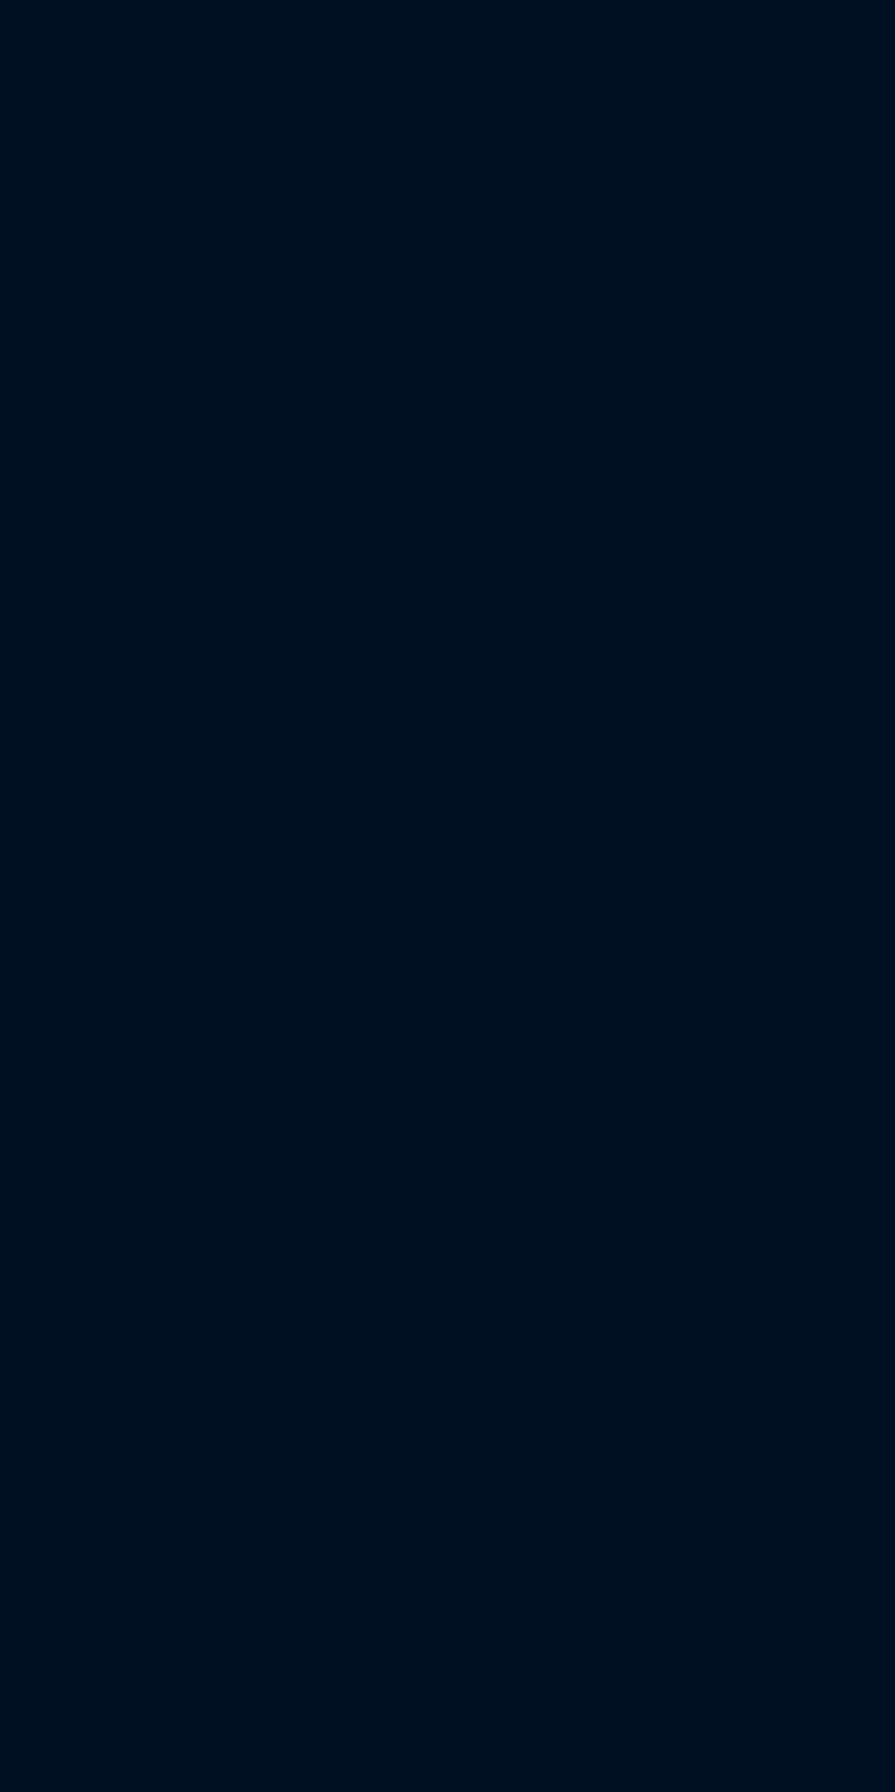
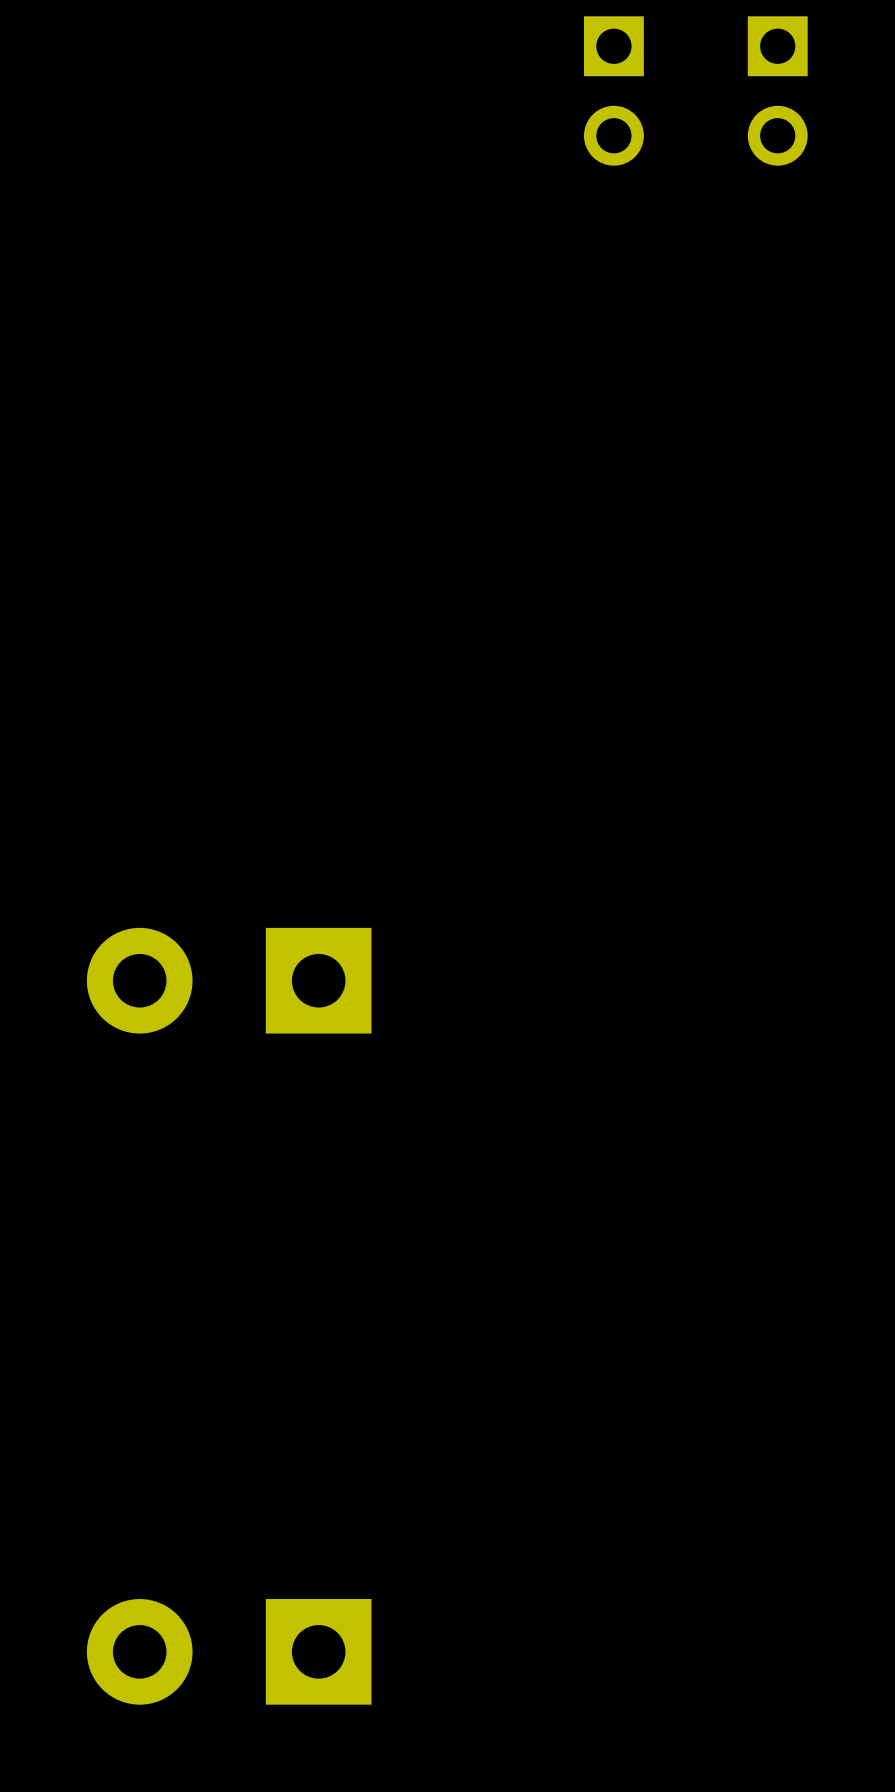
part: none -> (613, 91)
part: none -> (777, 91)
part: none -> (229, 980)
part: none -> (229, 1651)

